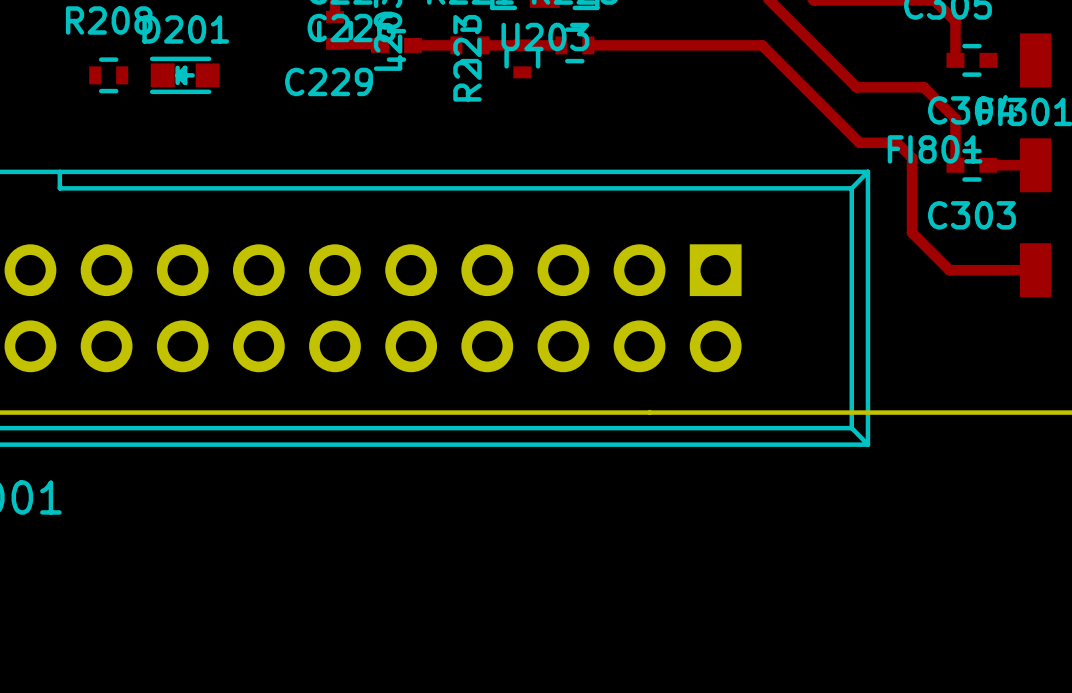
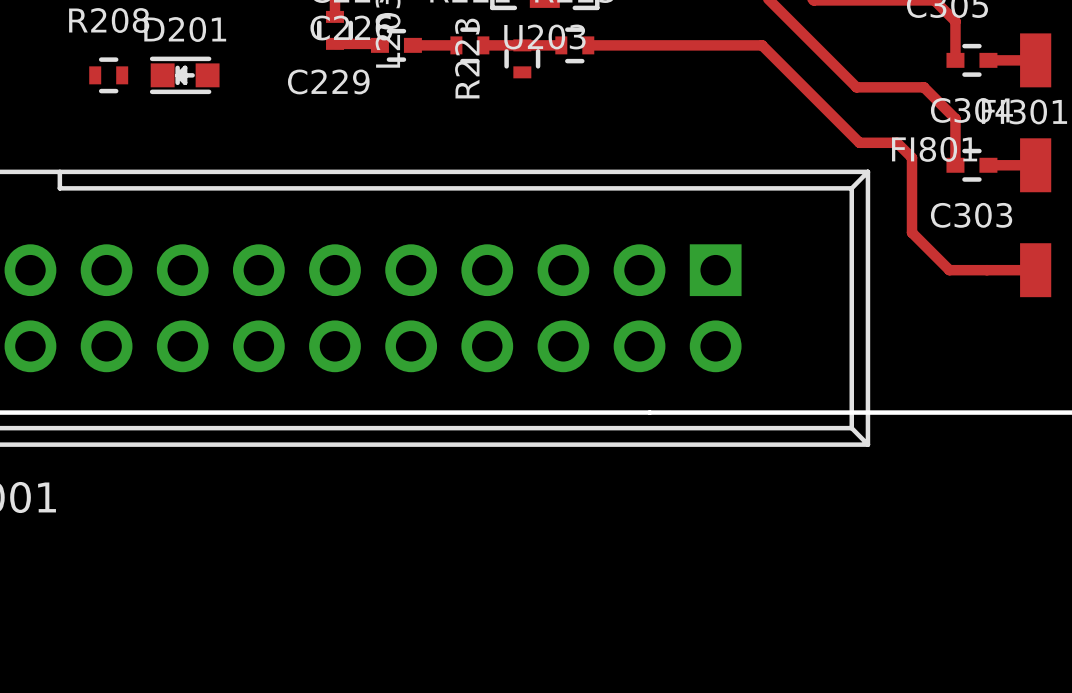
track: none -> (988, 60) (1035, 60)

